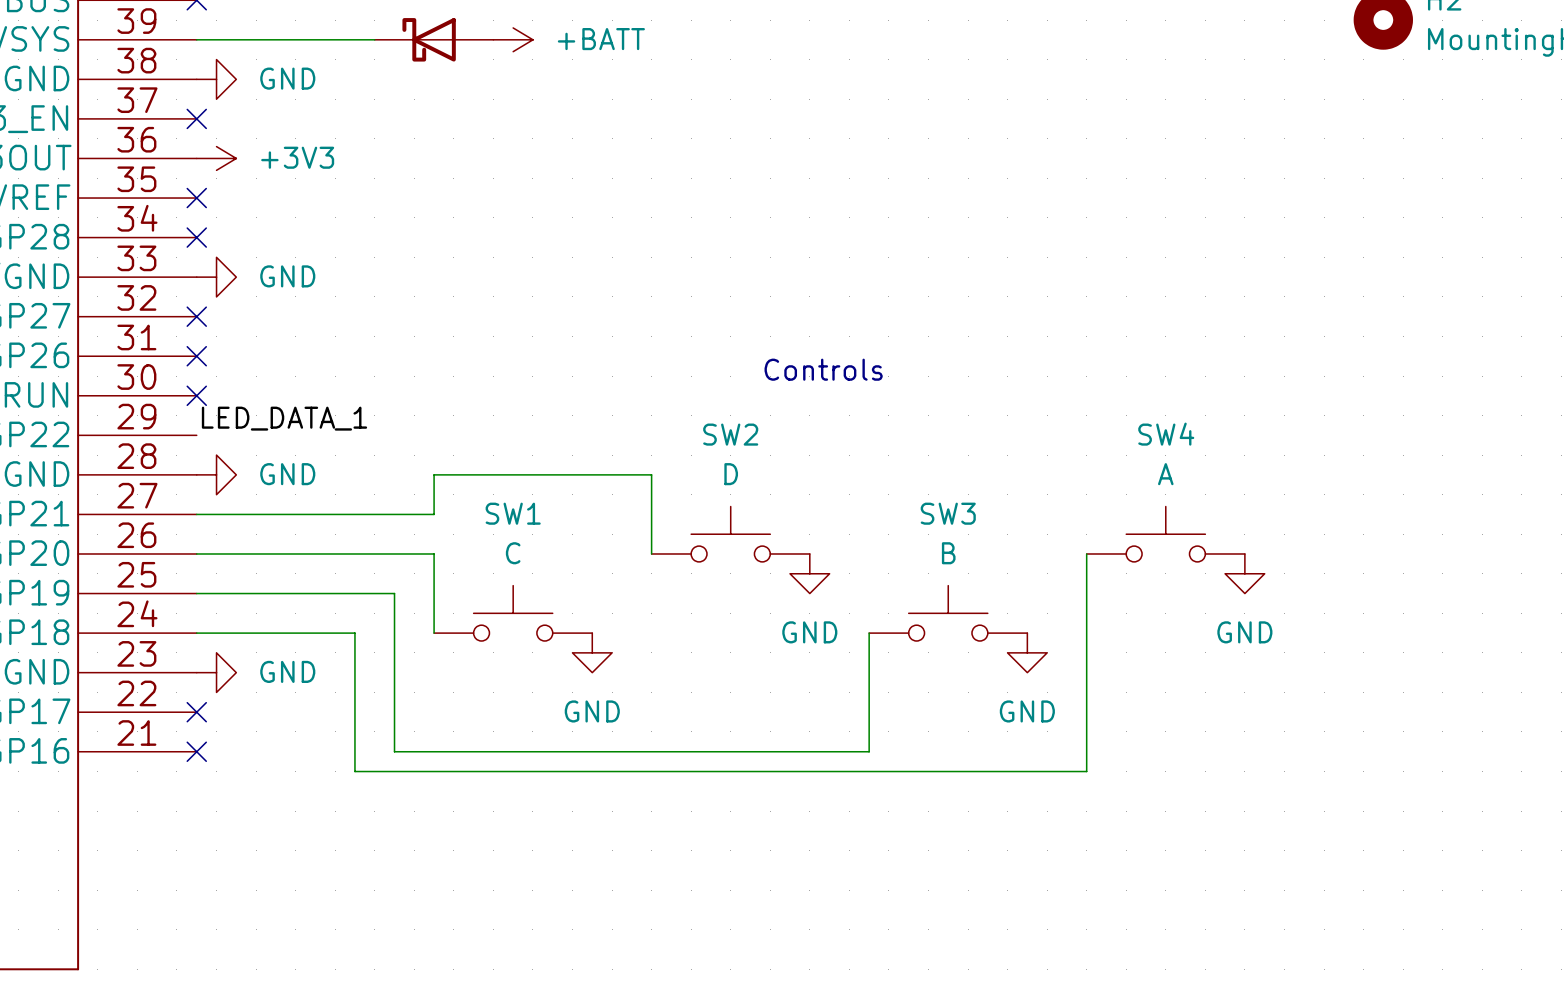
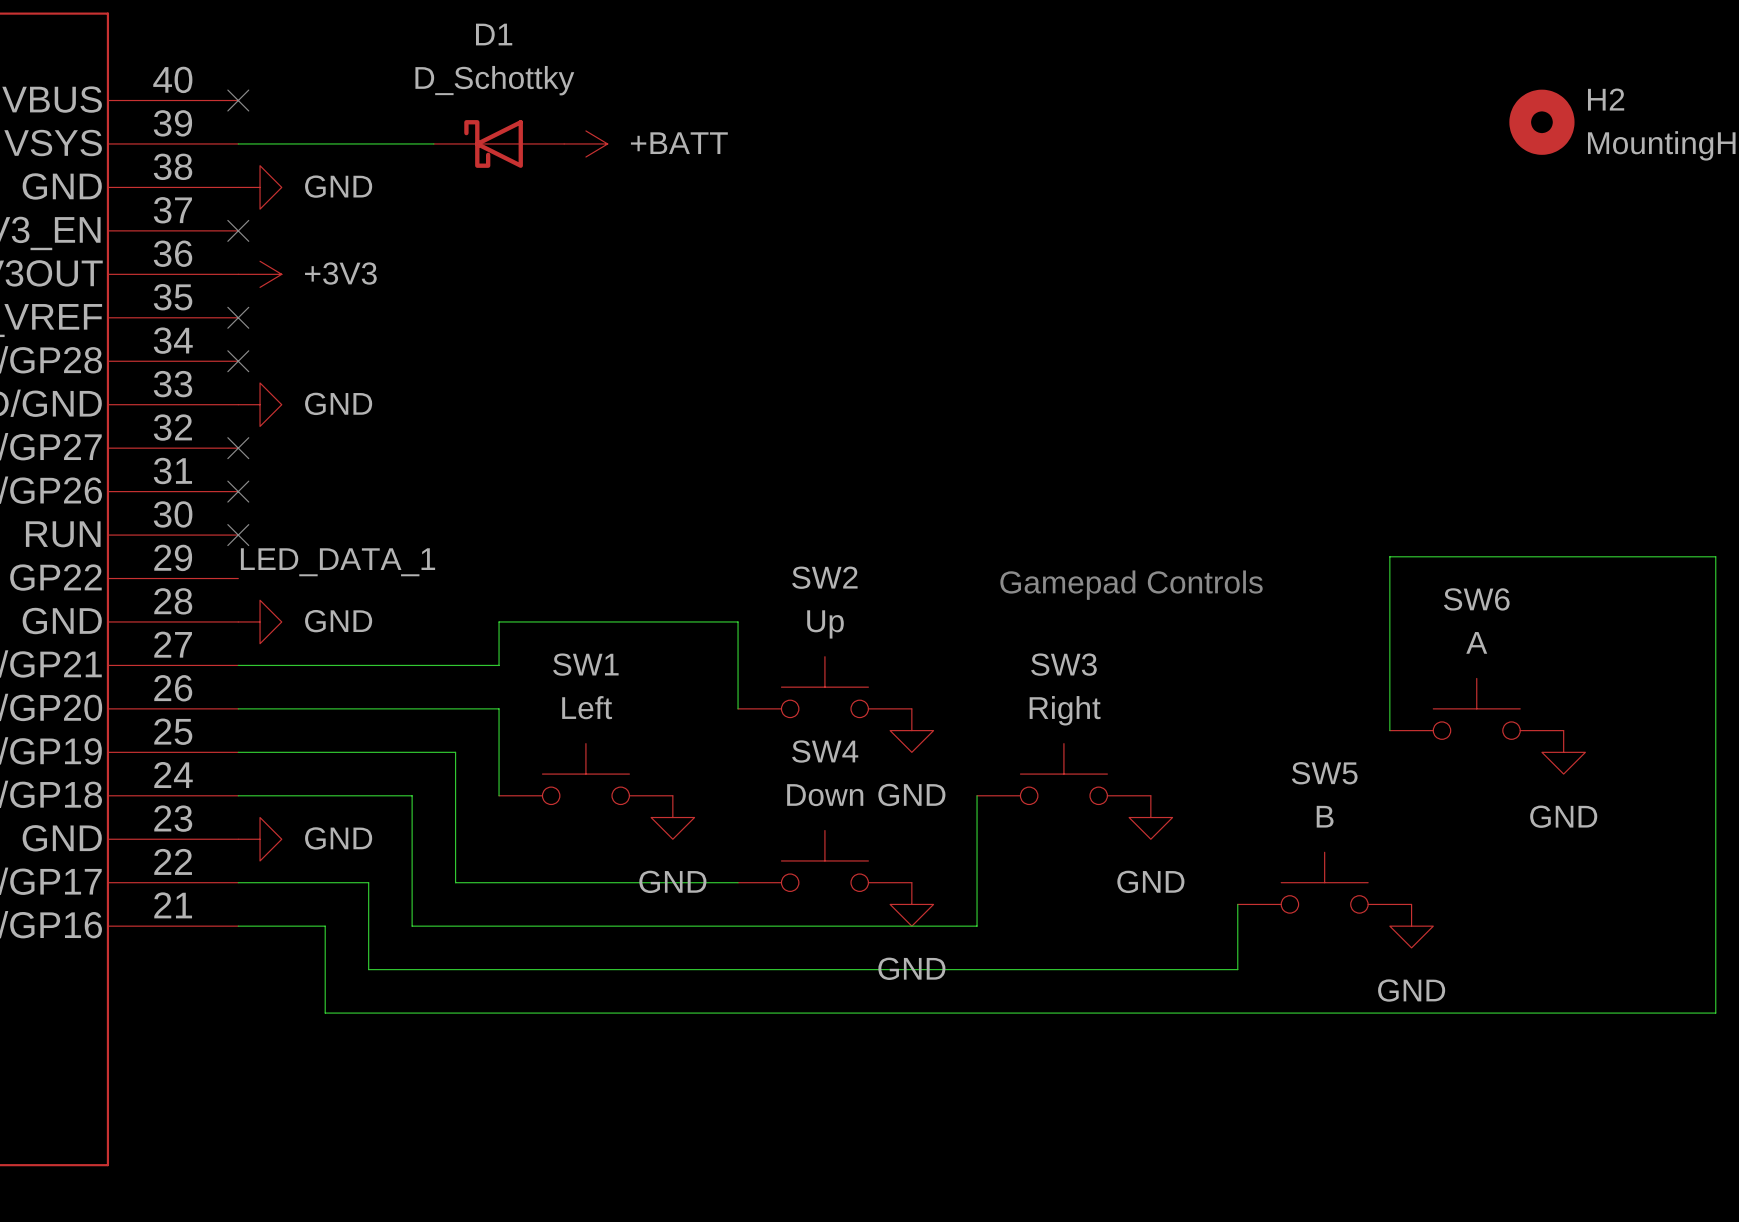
text: Controls (823, 369) -> none
text: none -> Gamepad Controls (1131, 585)
SW2 value: D (731, 474) -> Up (825, 624)
SW4 value: A (1165, 474) -> Down (825, 795)
SW4 position: (1165, 534) -> (824, 860)
SW1 value: C (513, 553) -> Left (587, 707)
SW3 value: B (948, 553) -> Right (1065, 710)
wire: (1086, 553) (1086, 771) (354, 771) (354, 751) -> none
SW6: none -> A (1476, 708)
wire: none -> (1389, 730) (1389, 556) (1715, 556) (1715, 1013) (325, 1013) (325, 926) (238, 926)
power symbol: GND (1244, 573) -> none
power symbol: none -> GND (1563, 752)
wire: none -> (238, 882) (368, 882) (368, 969) (1237, 969) (1237, 904)
no-connect mark: (196, 712) -> none
wire: (394, 712) (394, 751) -> (412, 926) (455, 926)
wire: none -> (455, 882) (738, 882)
SW5: none -> B (1324, 882)
power symbol: none -> GND (911, 904)
no-connect mark: (196, 751) -> none
power symbol: none -> GND (1411, 926)

